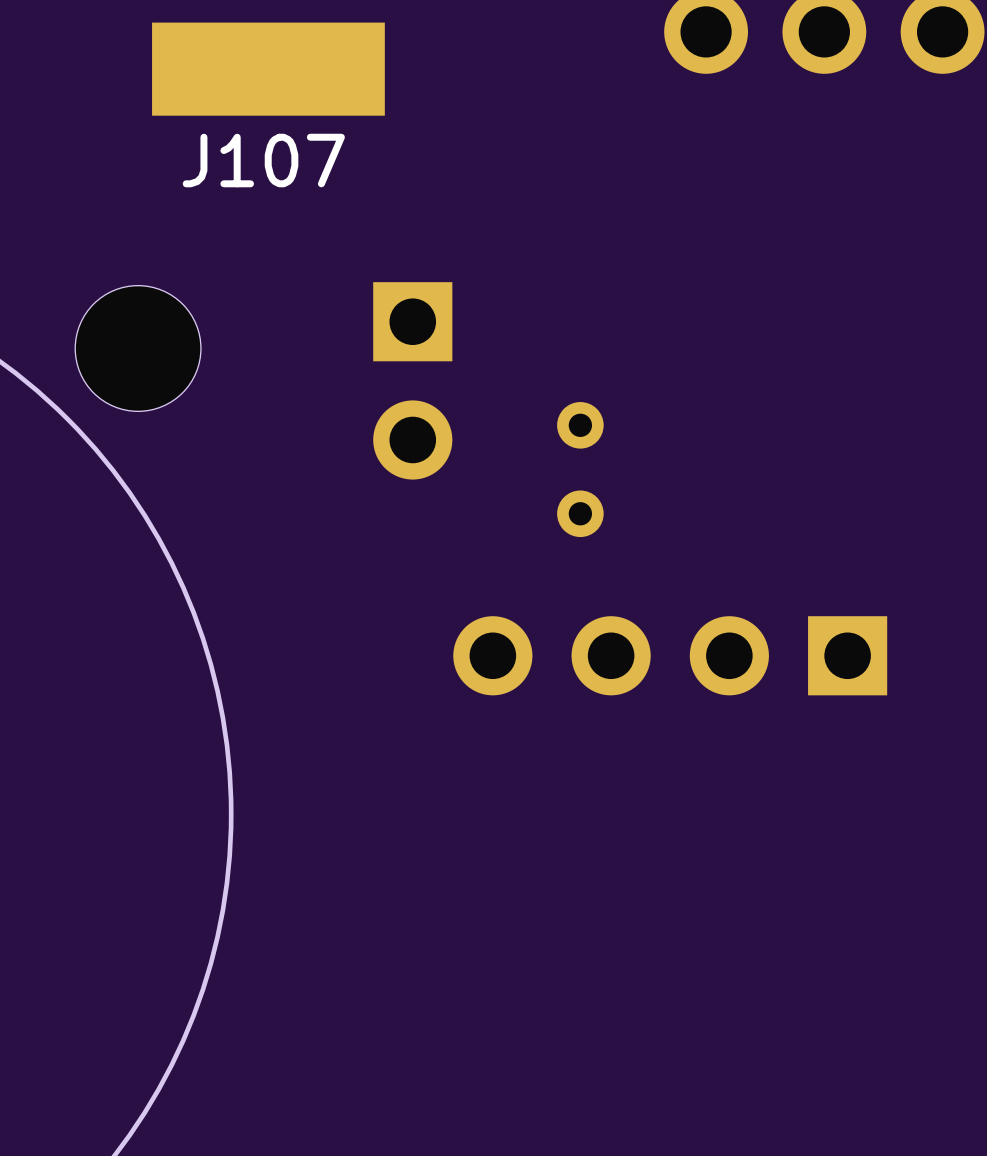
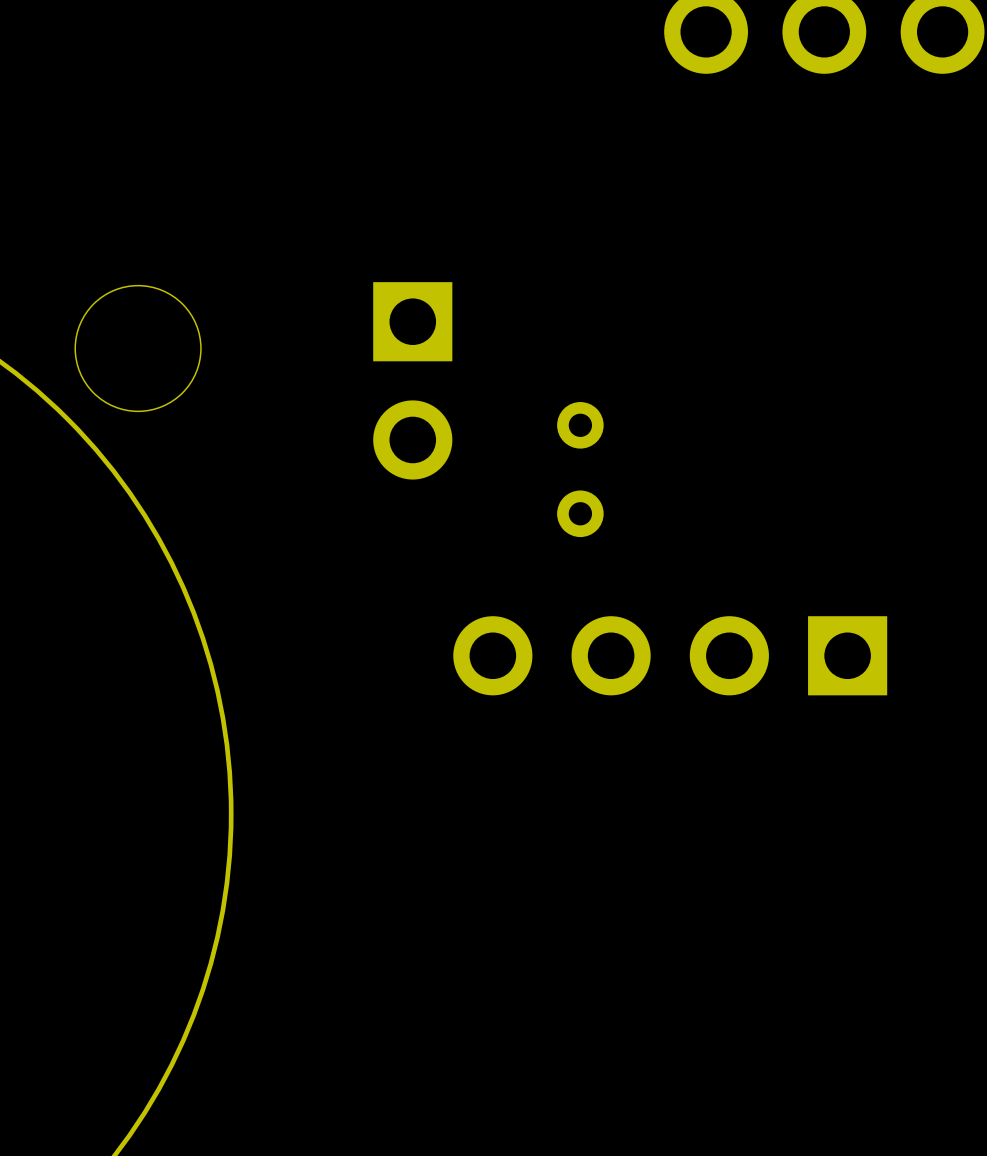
J107: (268, 69) -> none

